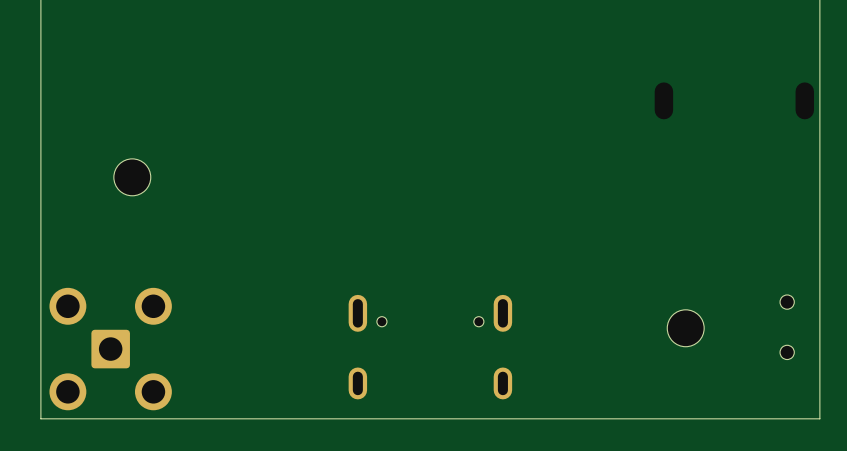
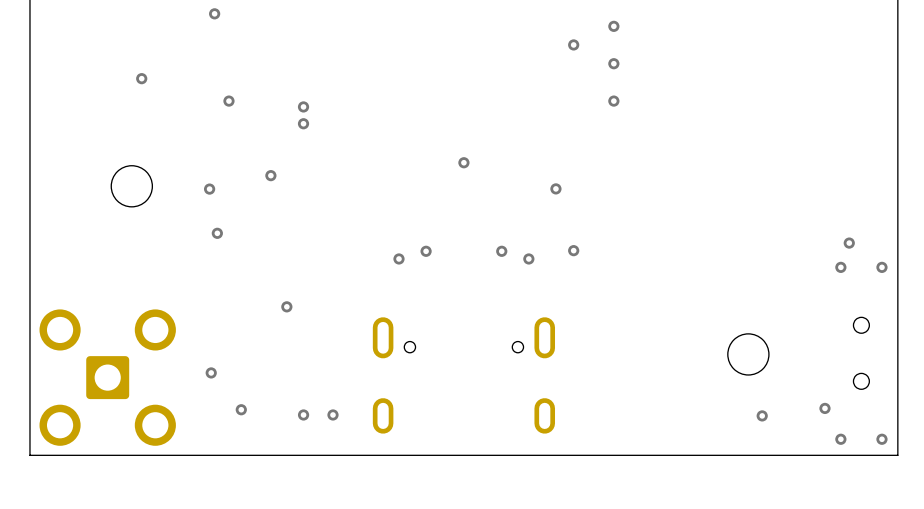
via: none -> (214, 13)
via: none -> (613, 26)
via: none -> (573, 44)
via: none -> (613, 63)
via: none -> (141, 78)
via: none -> (228, 101)
via: none -> (613, 101)
via: none -> (303, 106)
via: none -> (303, 123)
via: none -> (463, 162)
via: none -> (270, 175)
via: none -> (209, 189)
via: none -> (555, 188)
via: none -> (217, 233)
via: none -> (849, 243)
via: none -> (426, 251)
via: none -> (501, 251)
via: none -> (573, 250)
via: none -> (398, 258)
via: none -> (528, 258)
via: none -> (840, 267)
via: none -> (881, 267)
via: none -> (286, 306)
via: none -> (211, 372)
via: none -> (824, 408)
via: none -> (241, 409)
via: none -> (303, 414)
via: none -> (332, 414)
via: none -> (762, 415)
via: none -> (840, 439)
via: none -> (881, 439)

